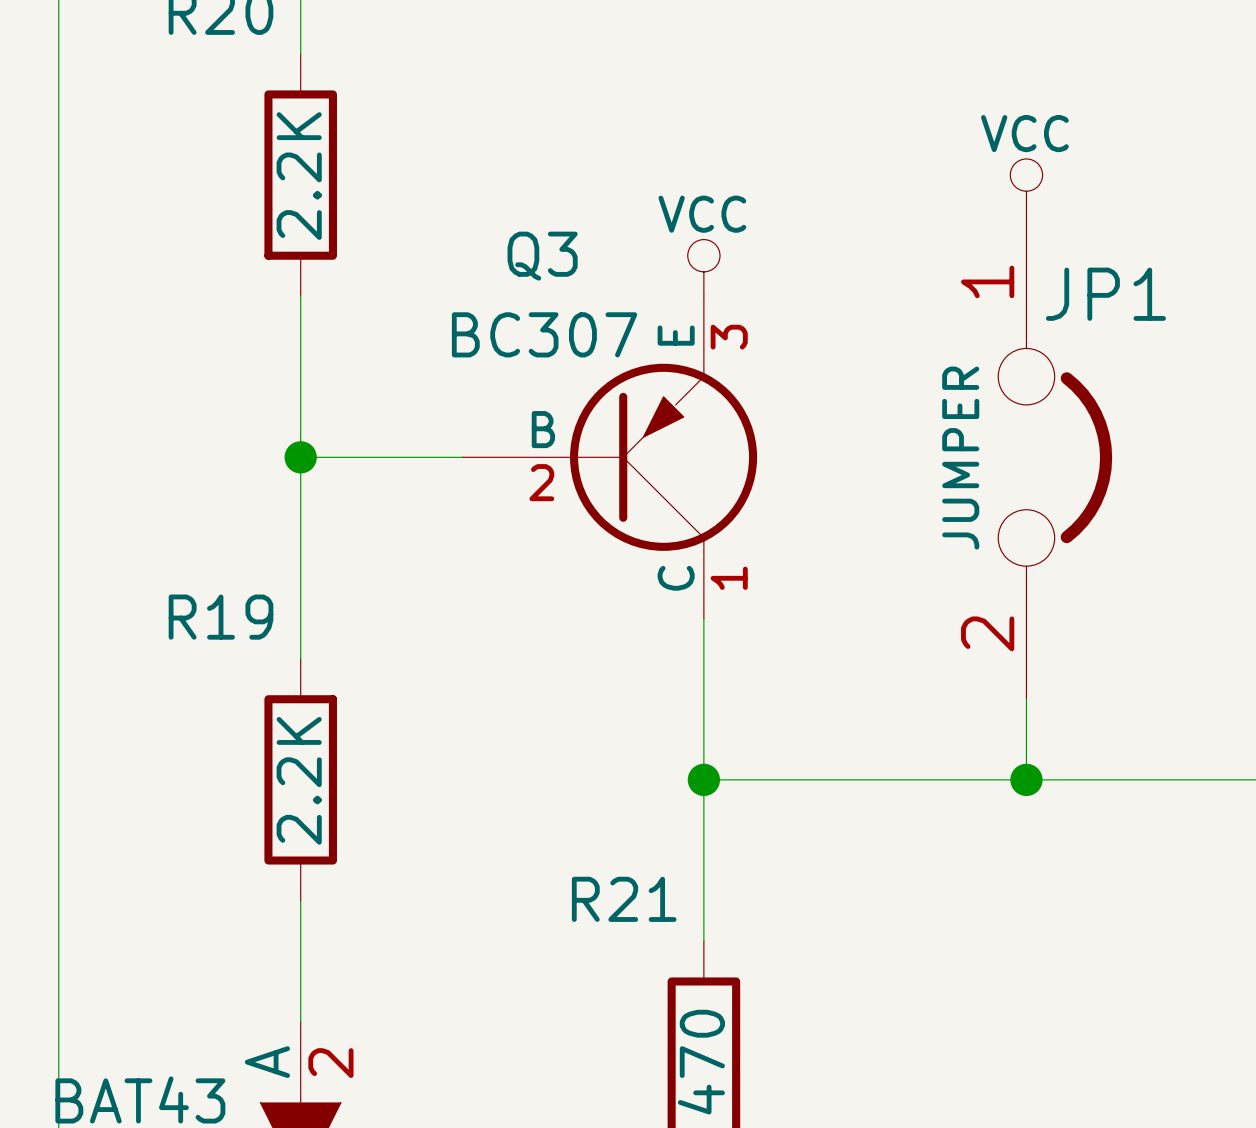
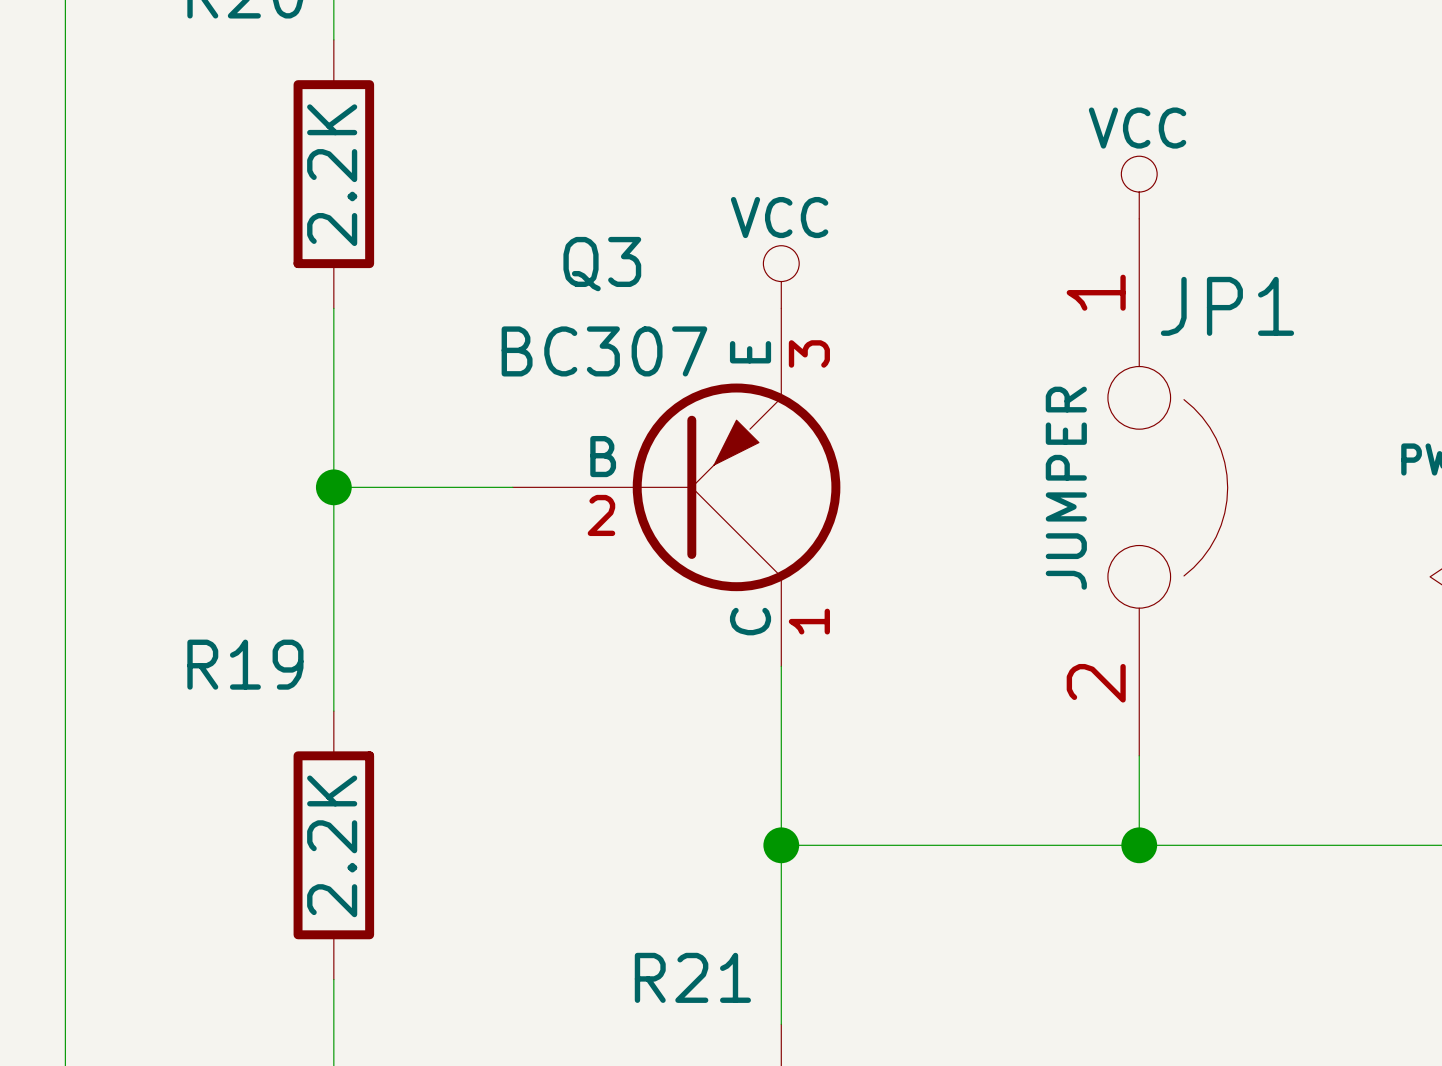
JP1 symbol: [998, 215, 1113, 700] -> [1107, 218, 1228, 756]

